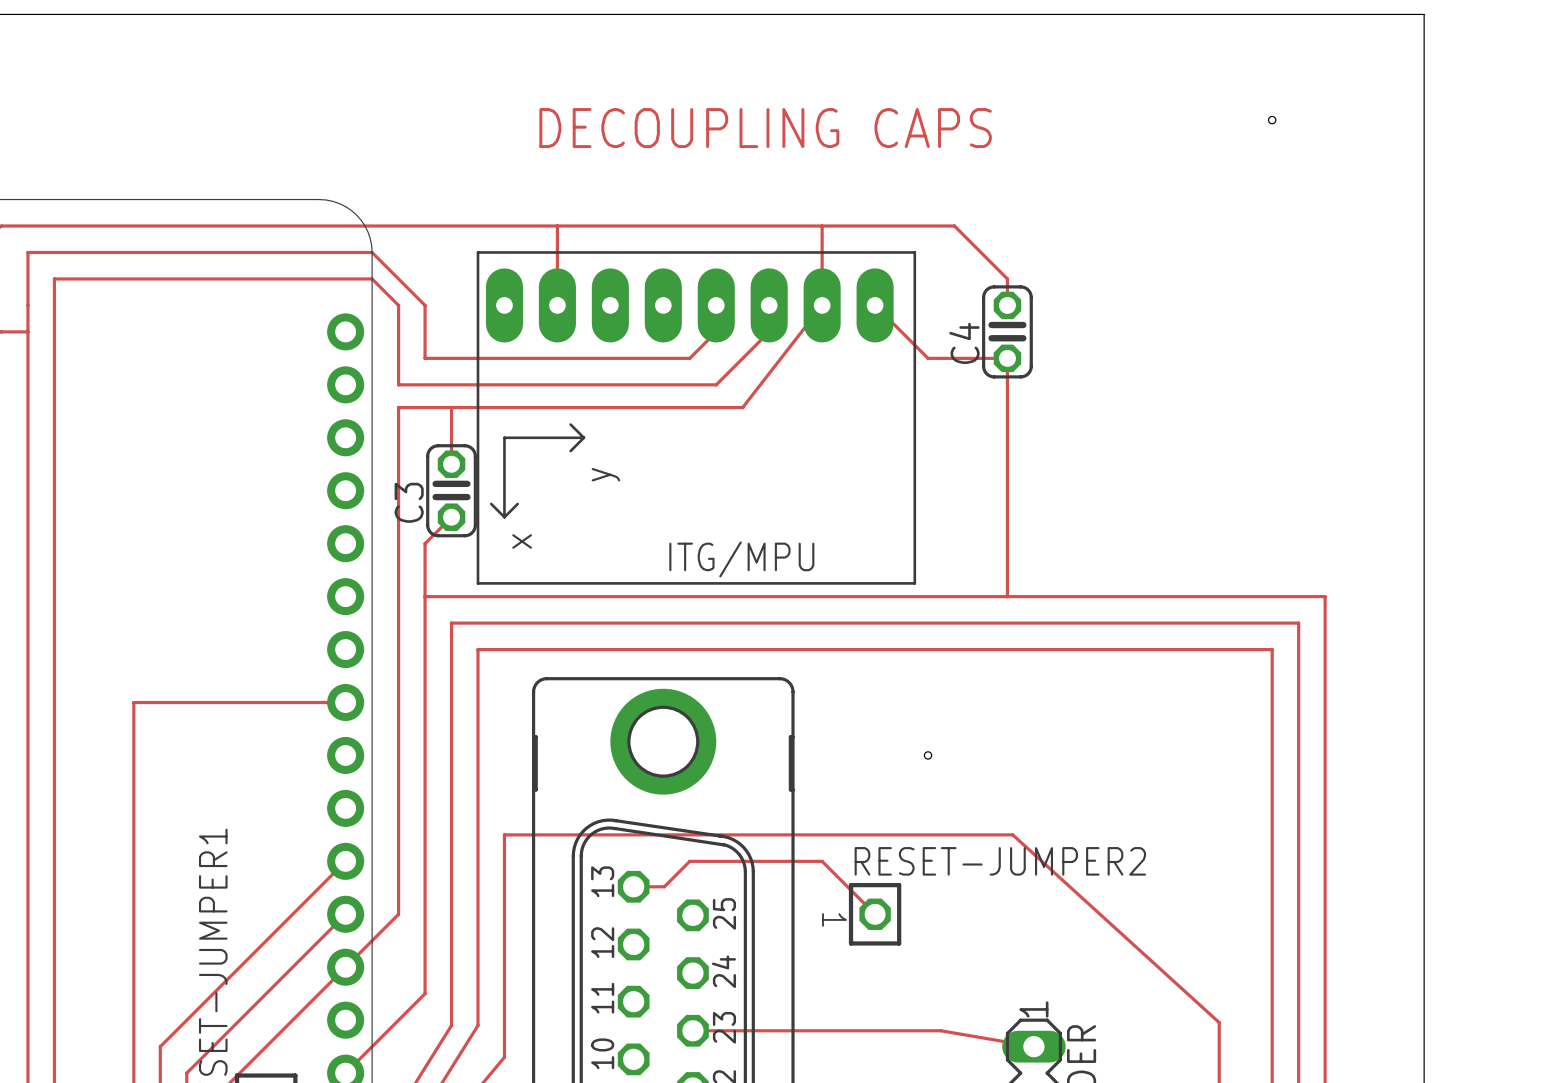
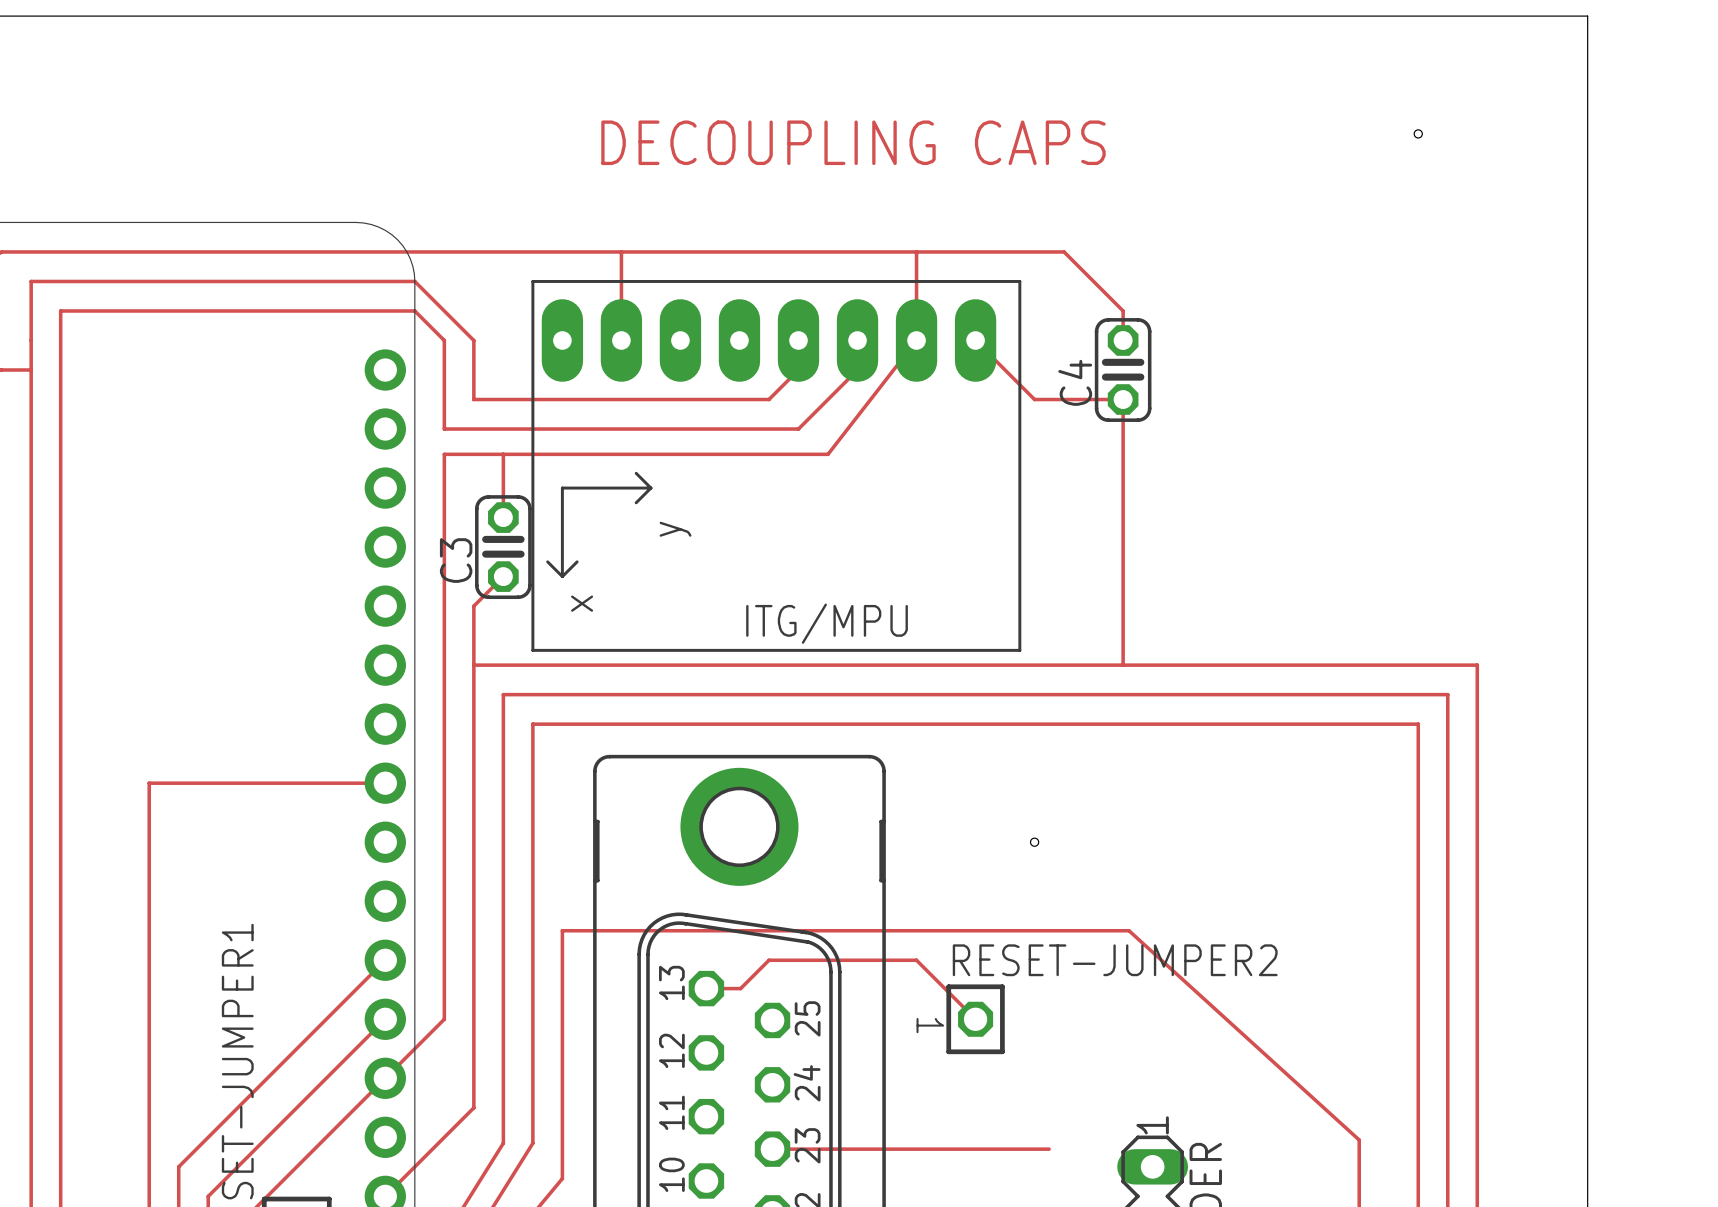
top track: (941, 1030) (1033, 1046) -> none

